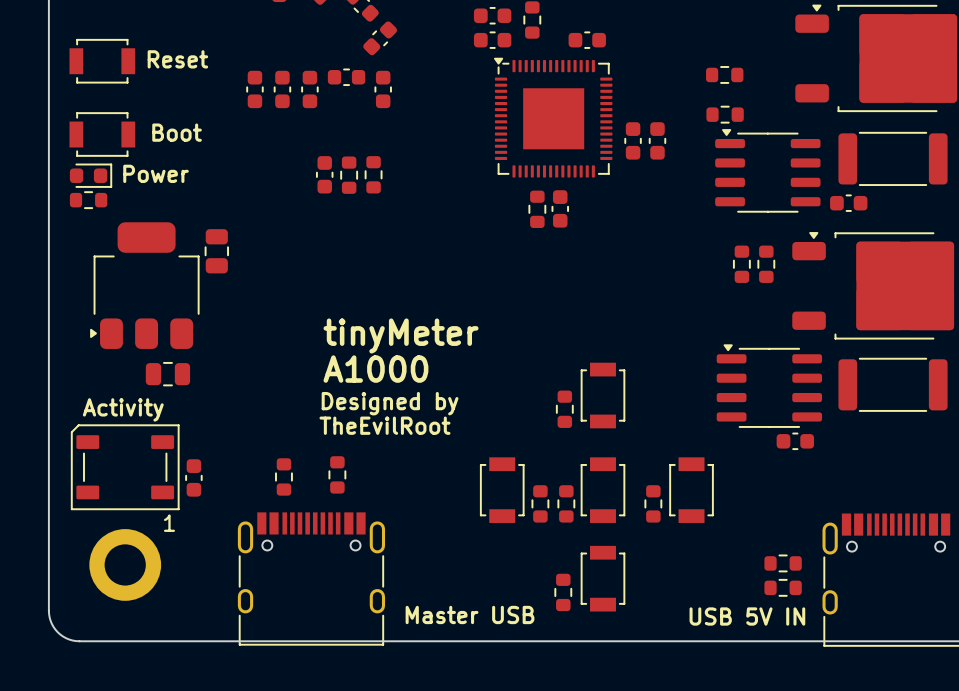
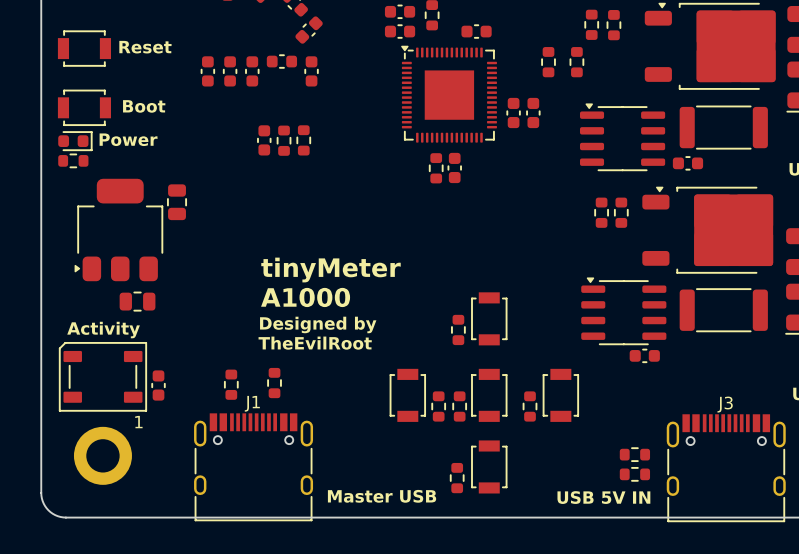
part: none -> (591, 24)
part: none -> (613, 25)
part rotation: 0° (724, 74) -> 90° clockwise (576, 62)
part: none -> (548, 62)
part: (725, 114) -> none
J1 name: none -> J1 (252, 403)
J3 name: none -> J3 (725, 404)

